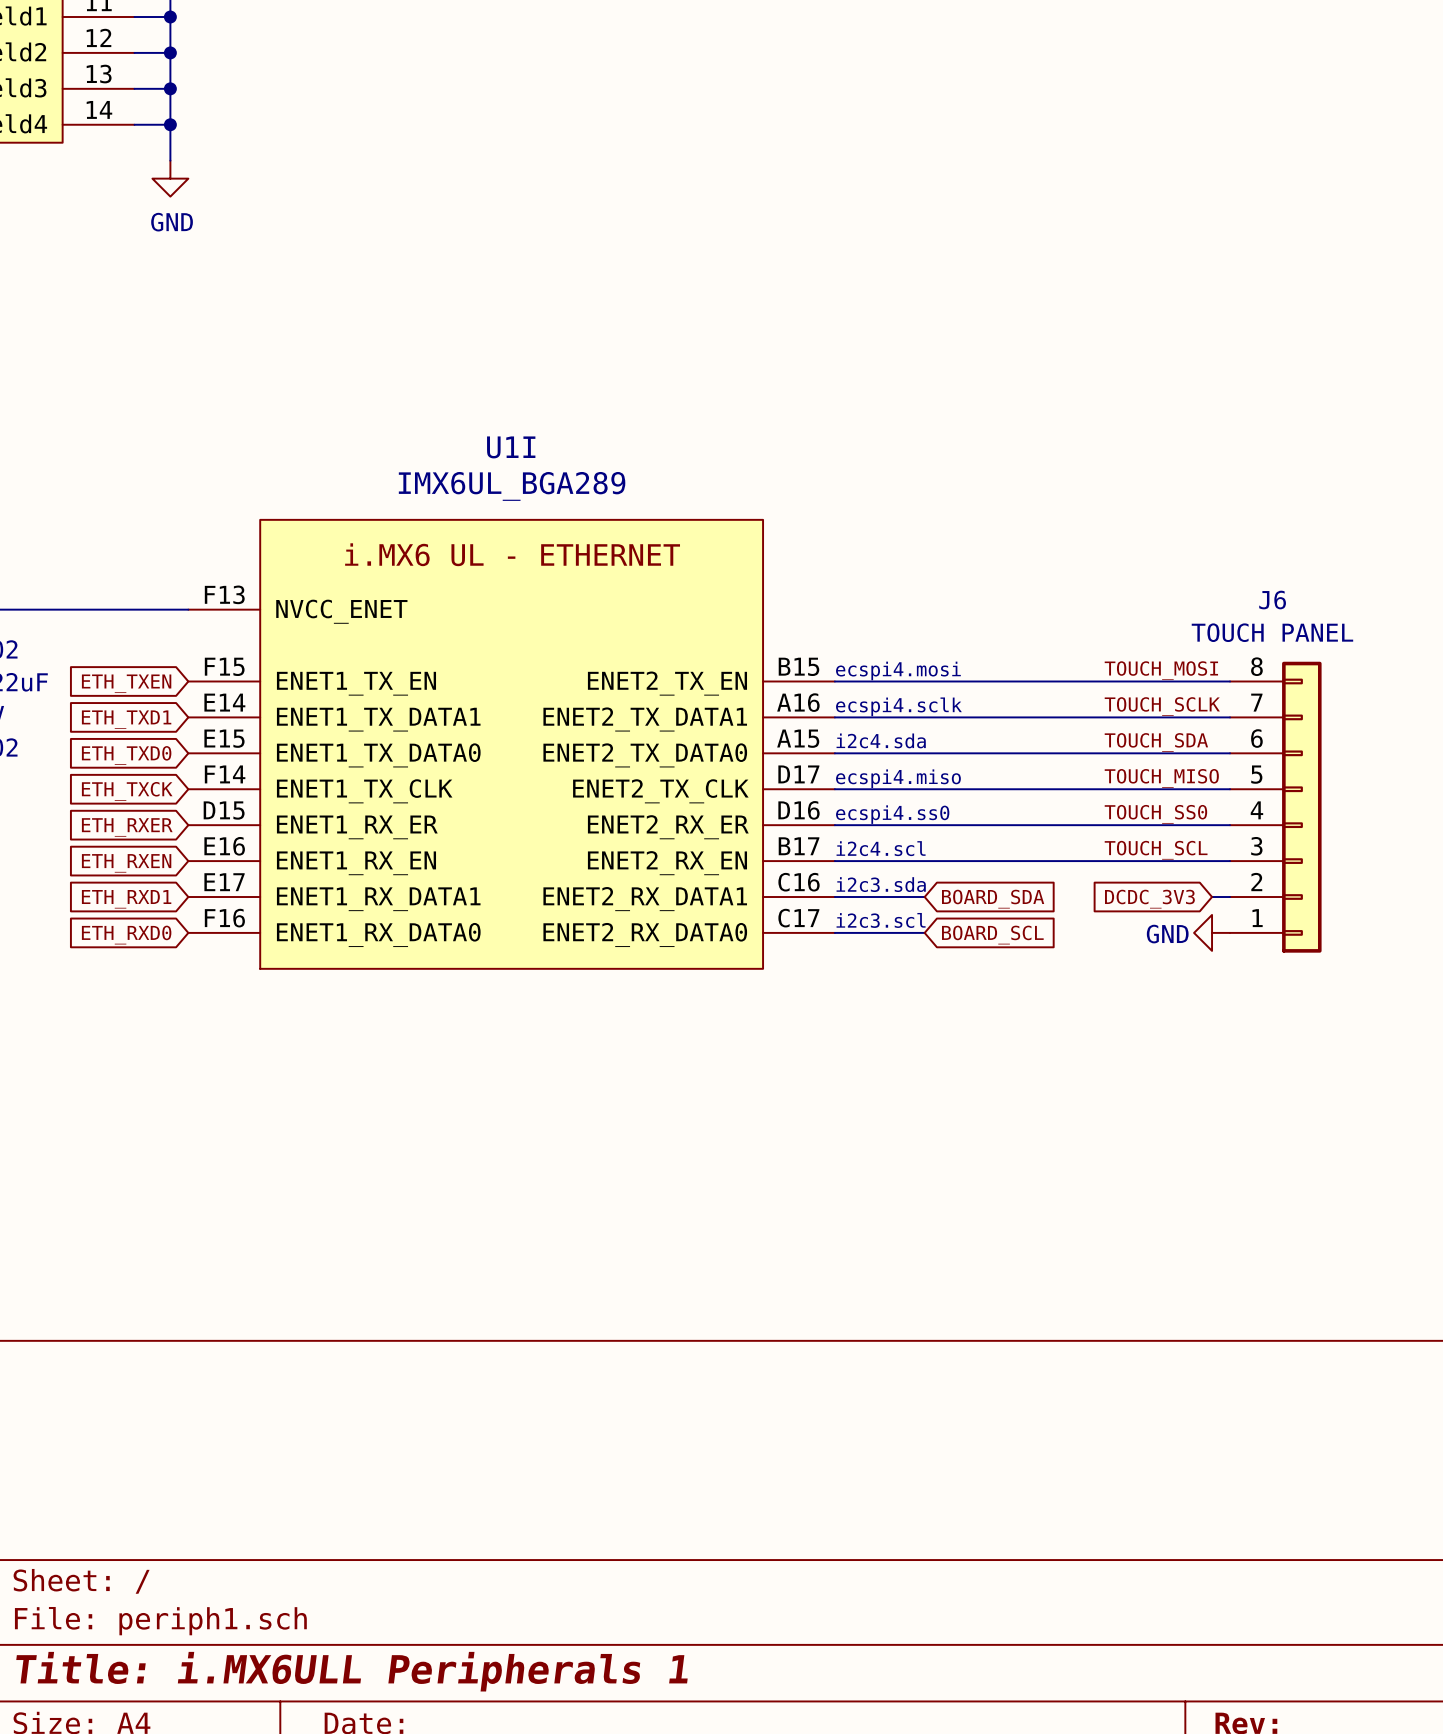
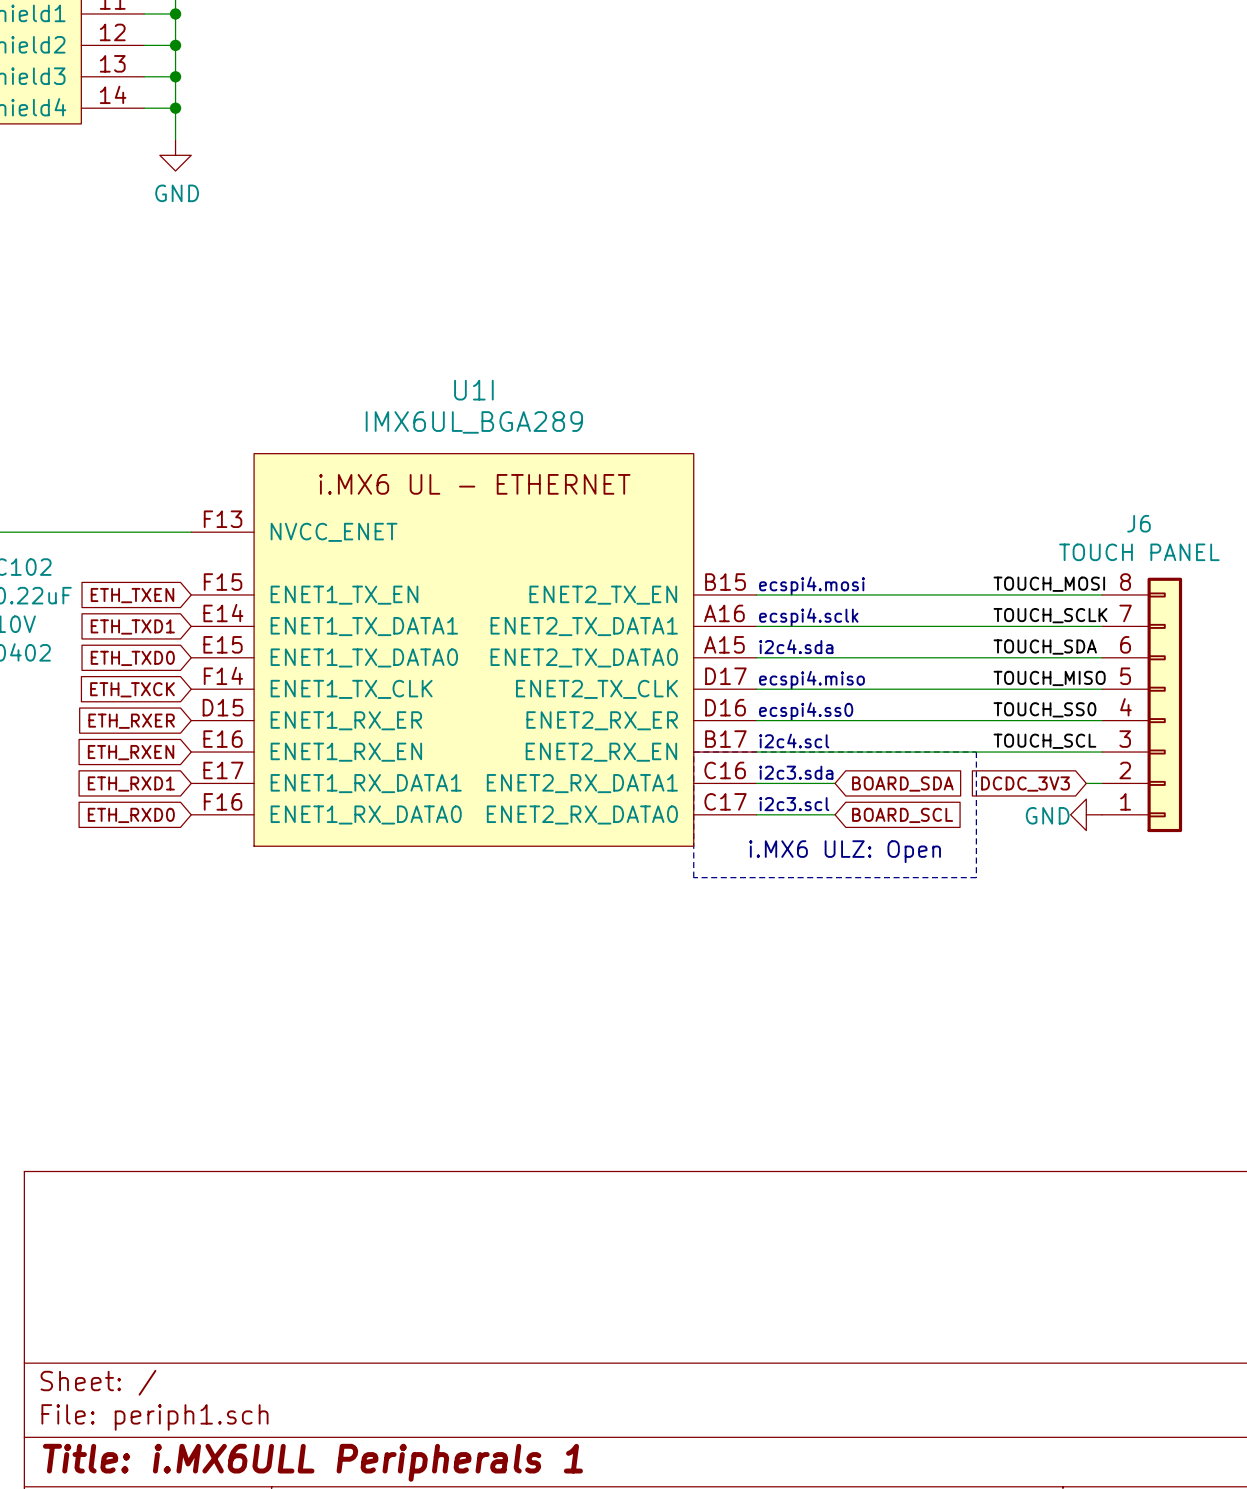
line: none -> (693, 752) (976, 752) (976, 877) (693, 877) (693, 752)
text: none -> i.MX6 ULZ: Open (845, 851)

